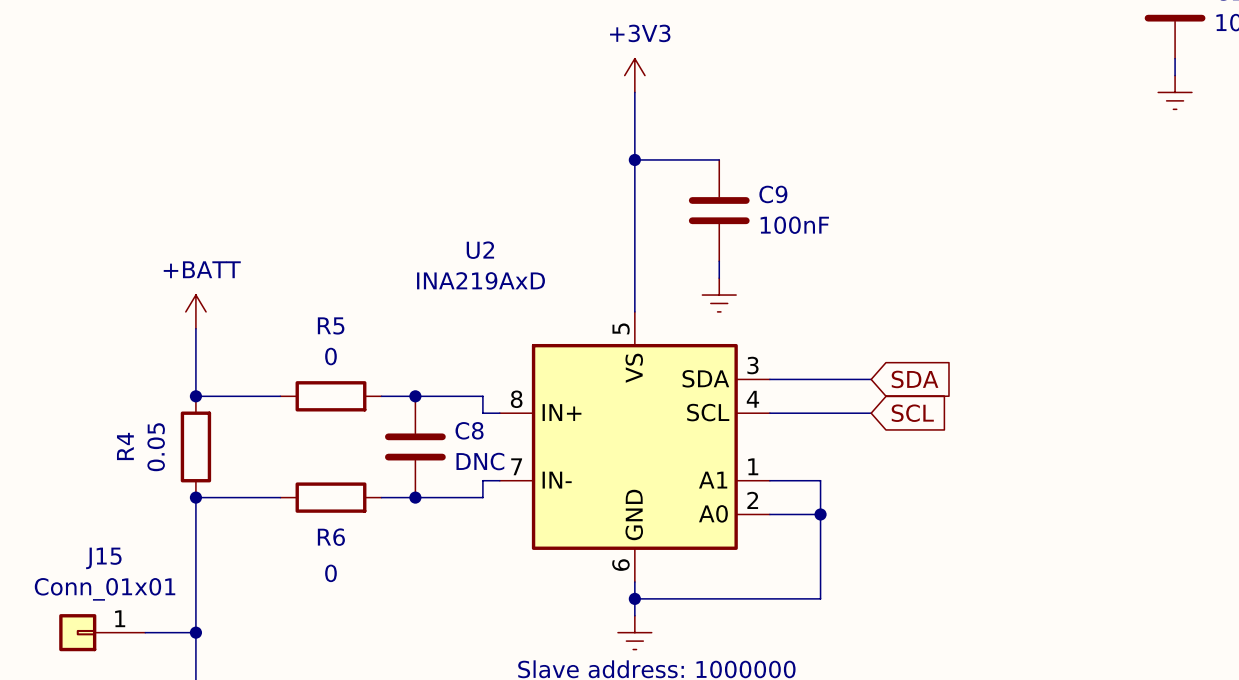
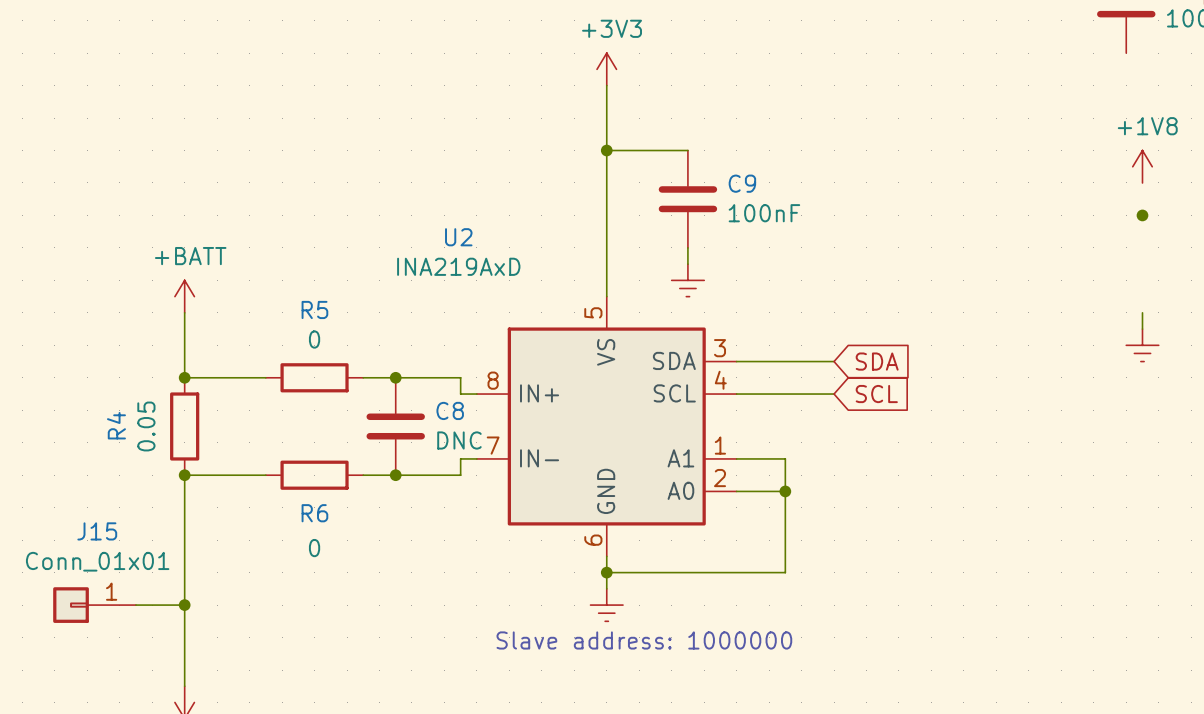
wire: (1175, 58) (1175, 75) -> (1142, 312) (1142, 329)
power symbol position: (1175, 92) -> (1142, 345)
power symbol: none -> +1V8 (1142, 166)
junction: none -> (1142, 215)

